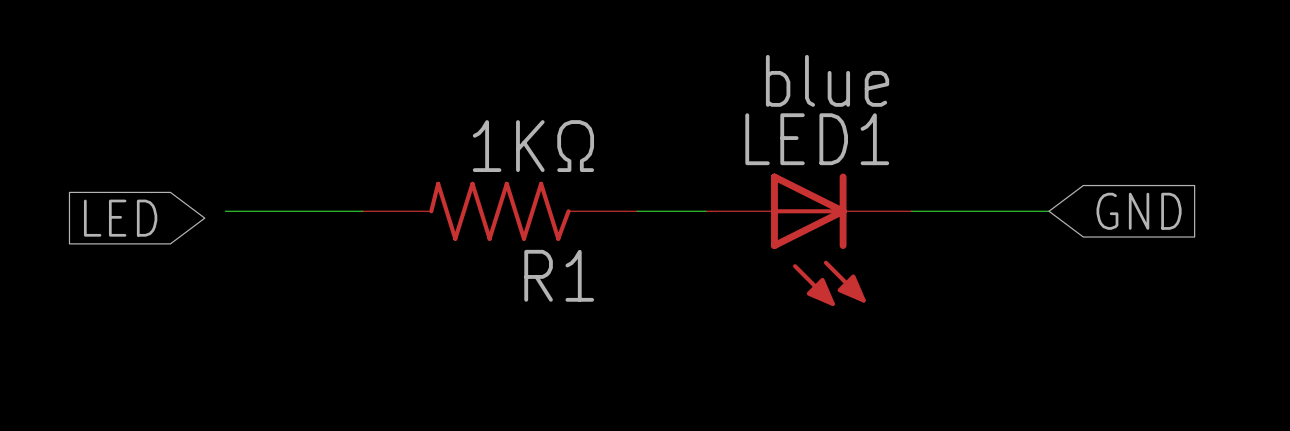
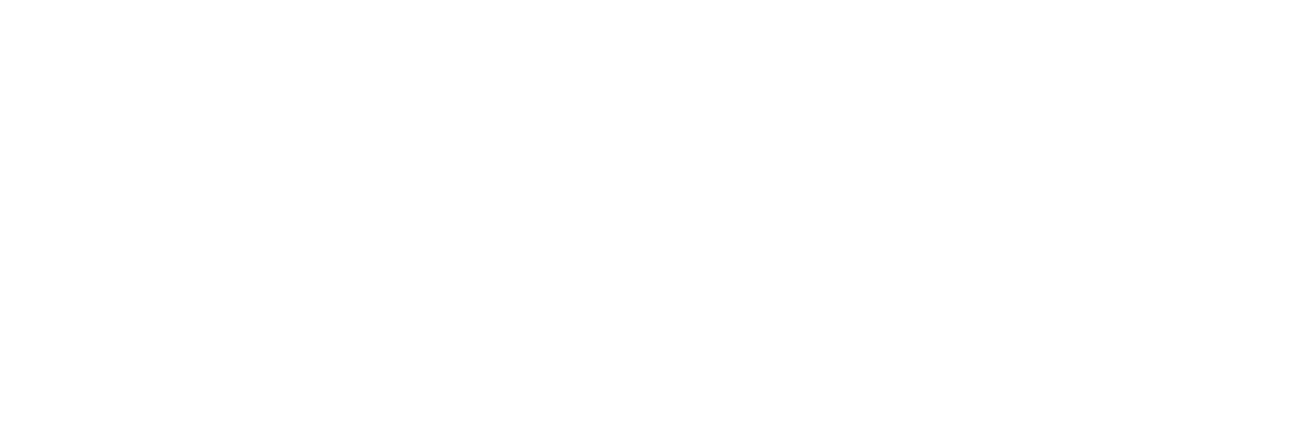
wire: (225, 211) (362, 211) -> none
R1: 1KΩ (499, 211) -> none
wire: (637, 211) (705, 211) -> none
wire: (911, 211) (1049, 211) -> none
global label: GND (1139, 211) -> none
global label: LED (120, 218) -> none
LED1: blue (808, 239) -> none

